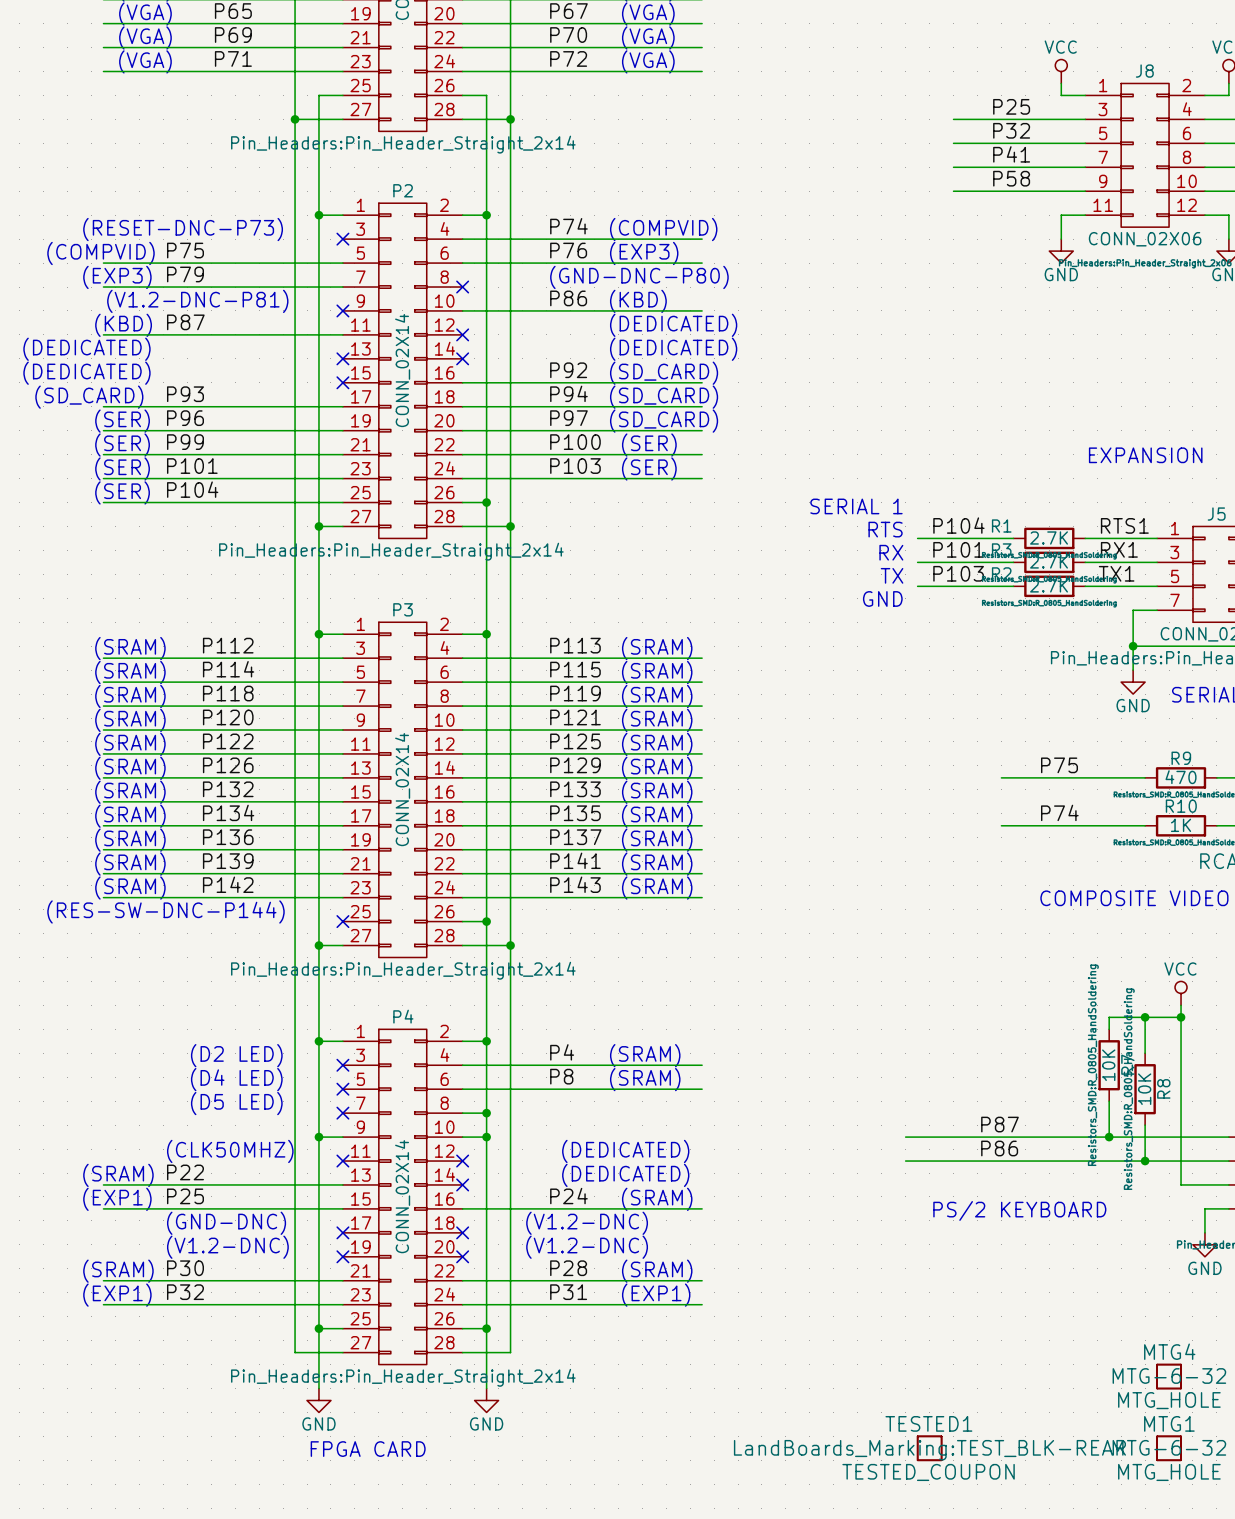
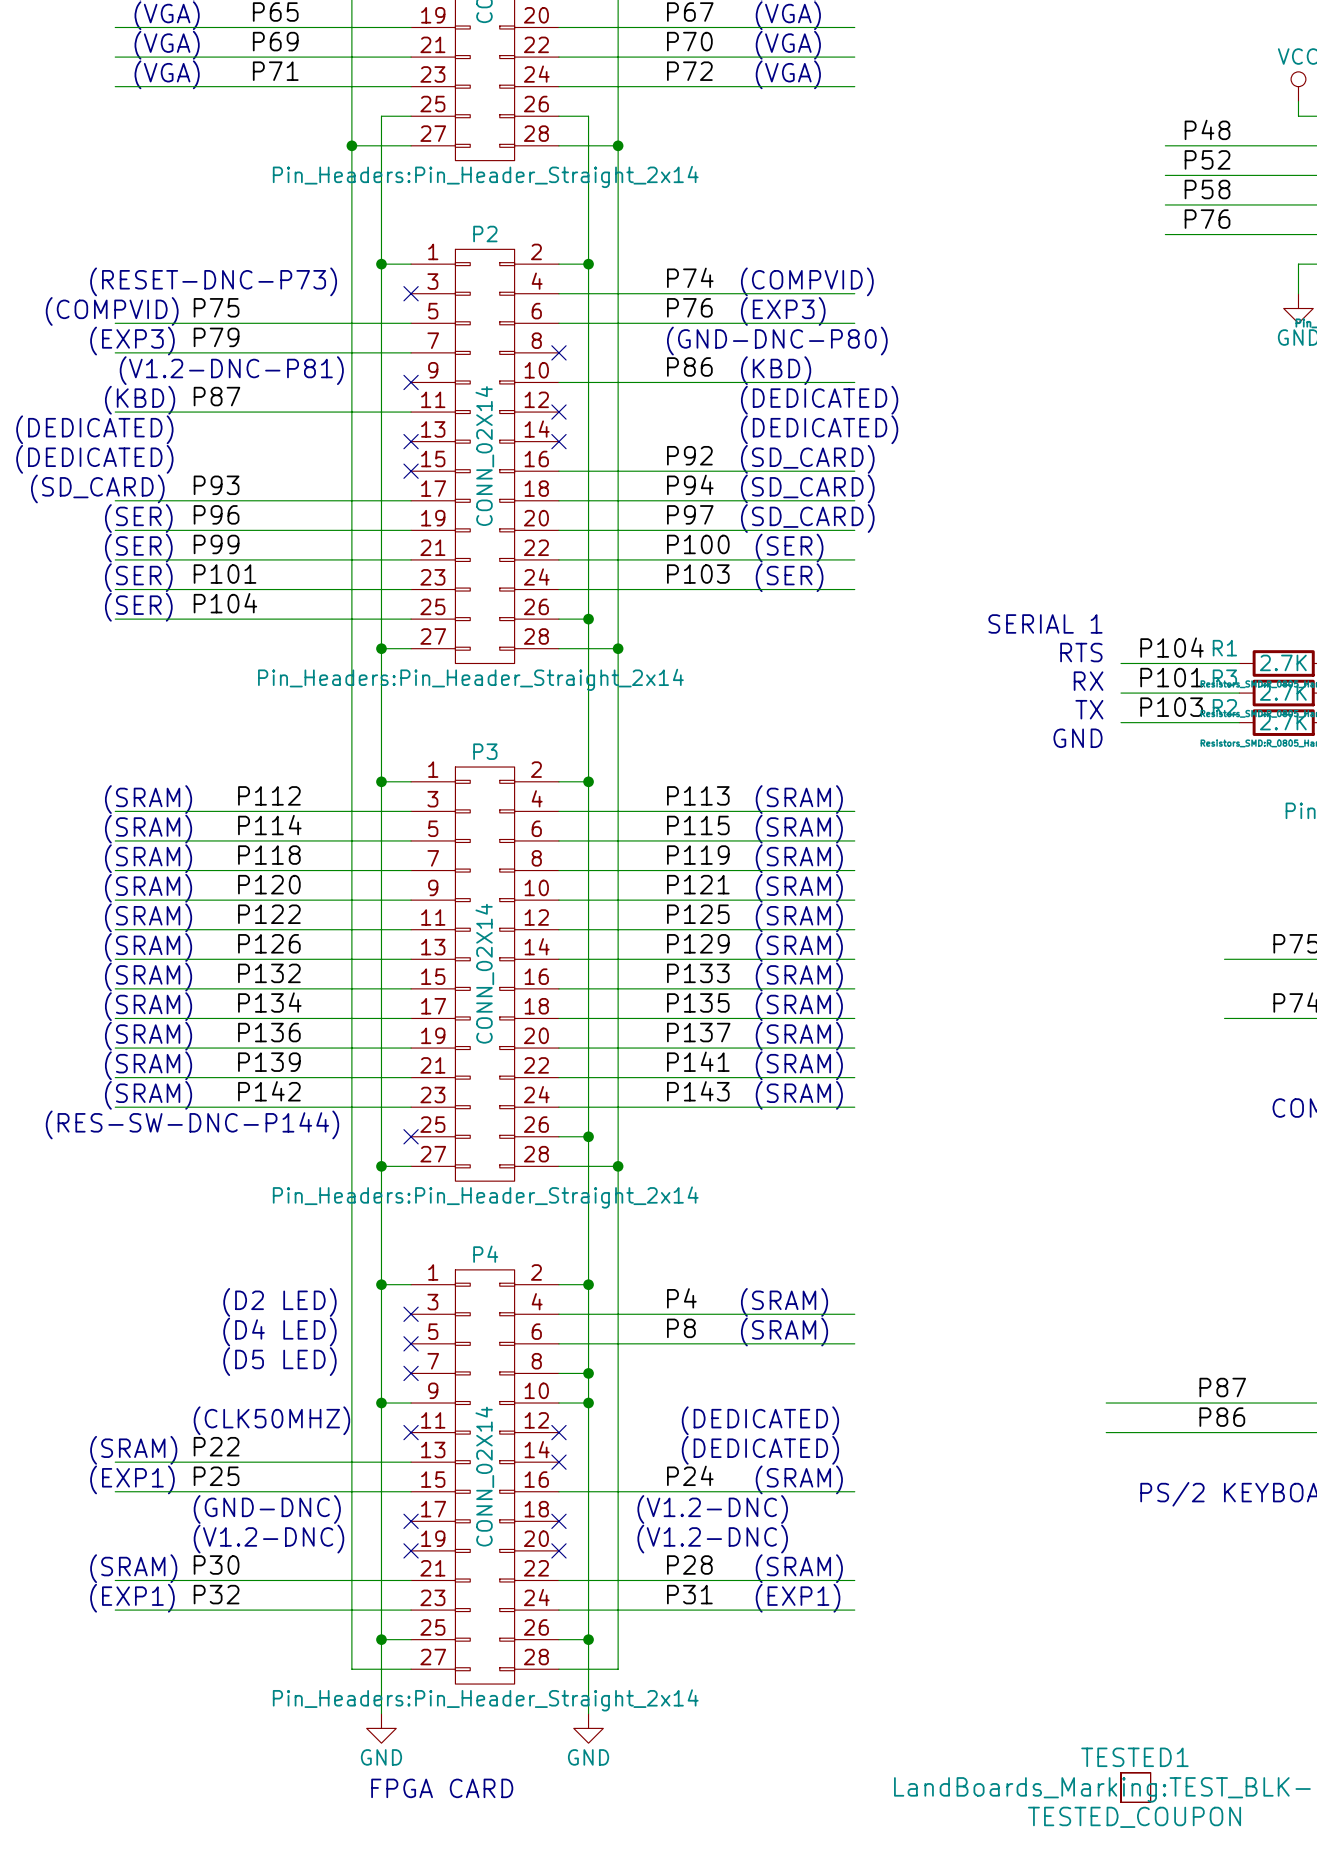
label: none -> P48 (1207, 129)
label: P25 (1011, 106) -> none
label: none -> P52 (1207, 159)
label: P32 (1011, 130) -> none
label: P41 (1011, 154) -> none
label: none -> P76 (1207, 219)
label position: P58 (1011, 178) -> P58 (1207, 189)

